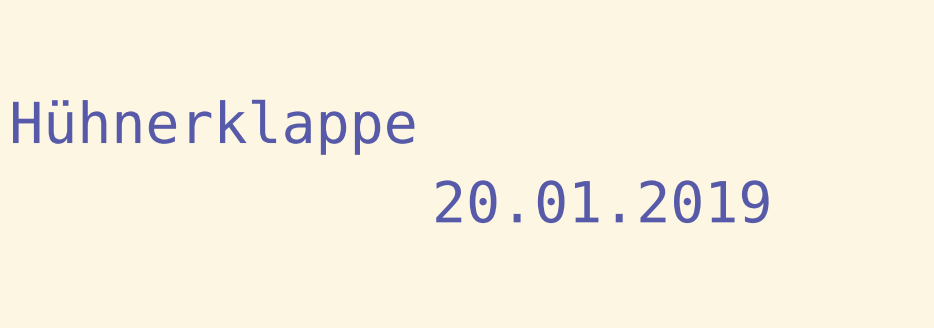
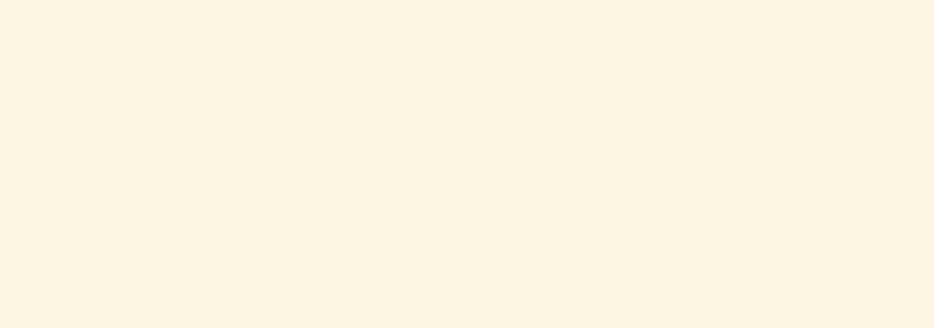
text: Hühnerklappe (213, 127) -> none
text: 20.01.2019 (602, 201) -> none

